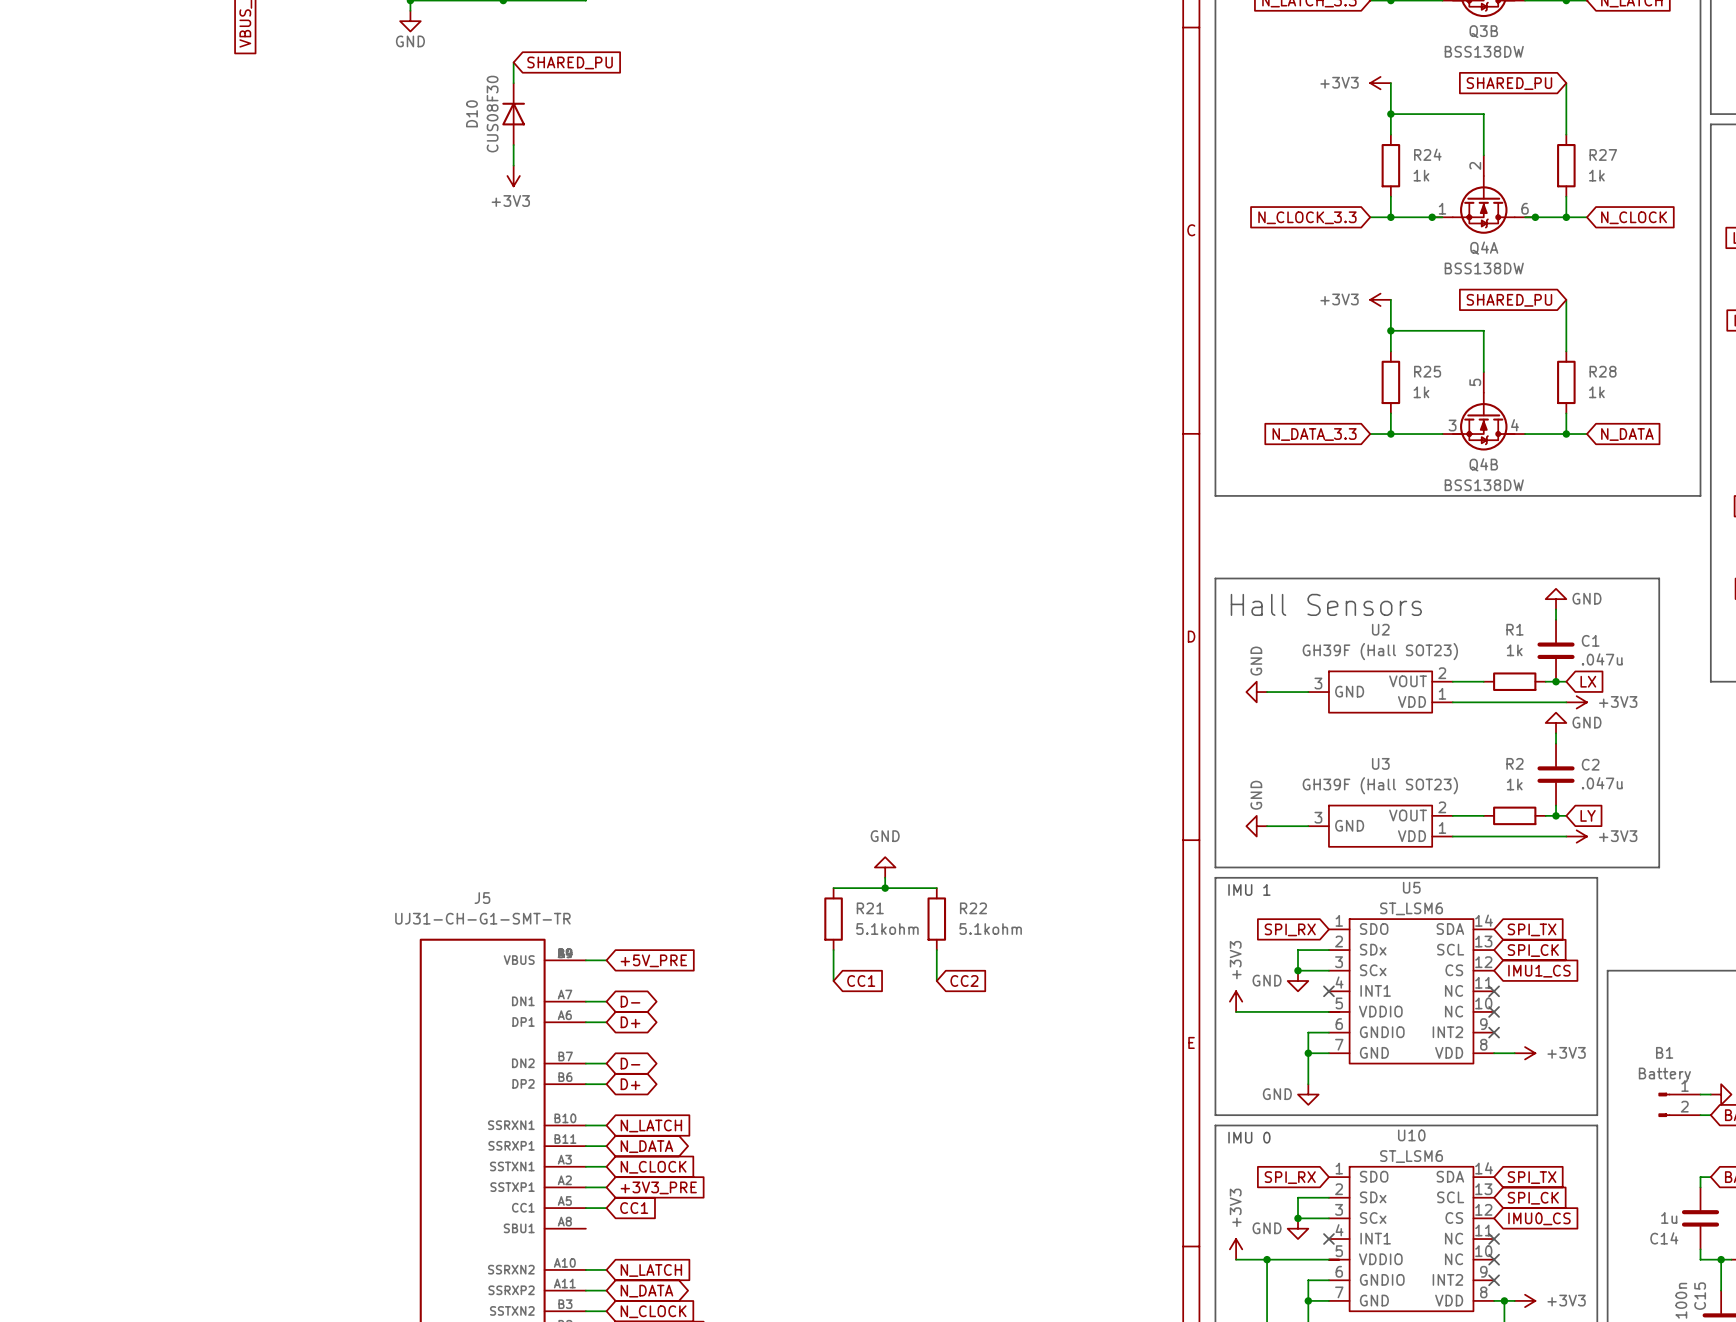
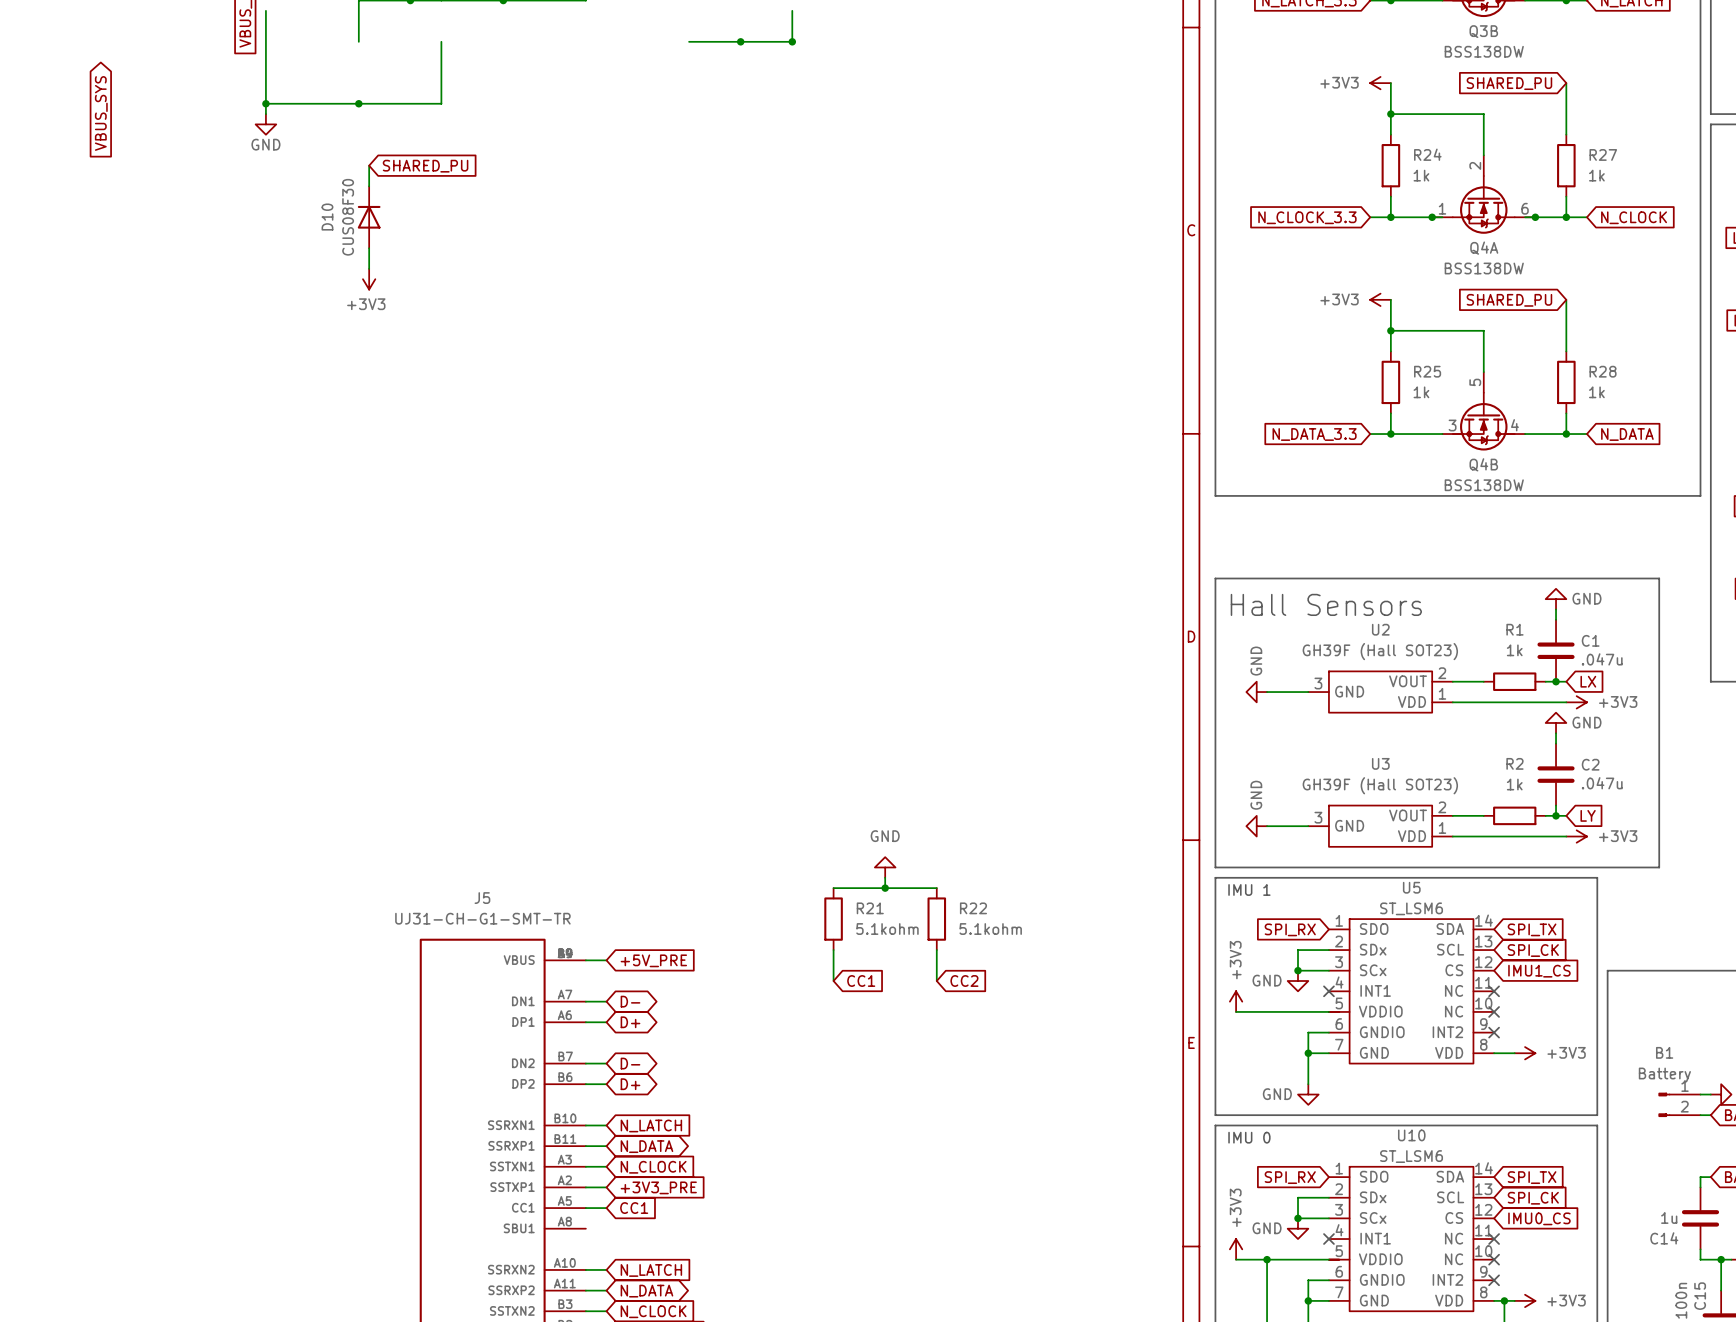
wire: (410, 0) (410, 10) -> (410, 0) (358, 0) (358, 41)
wire: none -> (265, 10) (265, 114)
wire: none -> (792, 10) (792, 41) (689, 41)
power symbol: GND (410, 21) -> none
wire: none -> (441, 41) (441, 103) (265, 103)
junction: none -> (740, 41)
junction: none -> (792, 41)
wire: (513, 62) (513, 83) -> (369, 165) (369, 186)
global label position: SHARED_PU (570, 62) -> SHARED_PU (425, 166)
junction: none -> (265, 103)
junction: none -> (358, 103)
global label: none -> VBUS_SYS (101, 113)
D10 position: (513, 114) -> (369, 217)
power symbol: none -> GND (265, 124)
wire: (513, 145) (513, 165) -> (369, 248) (369, 268)
power symbol position: +3V3 (513, 176) -> +3V3 (369, 279)

